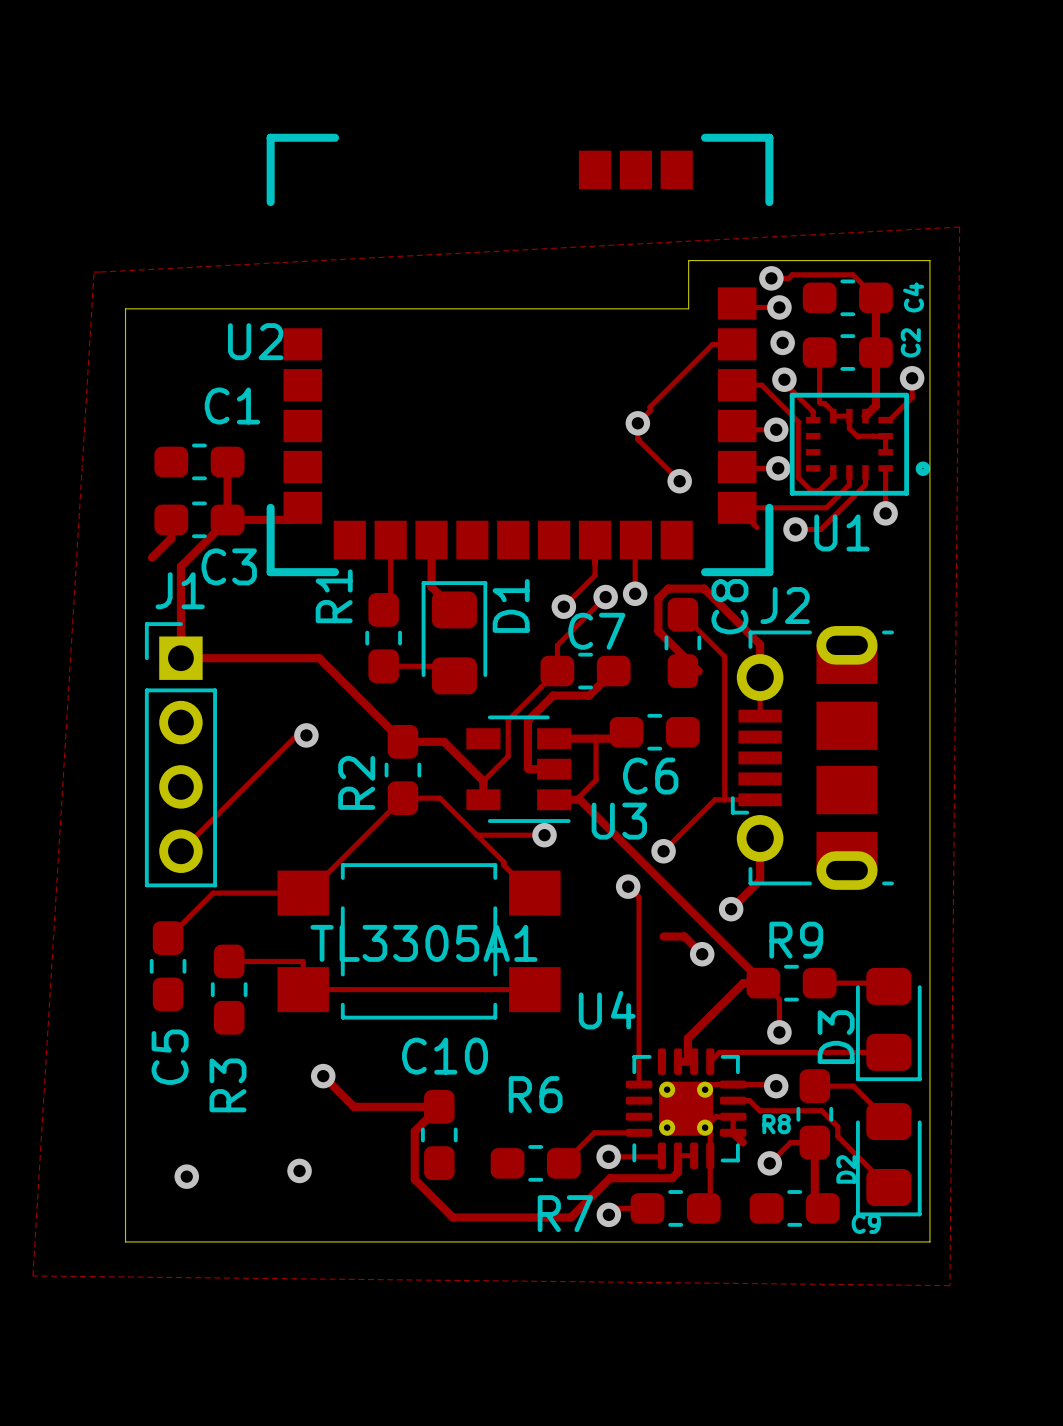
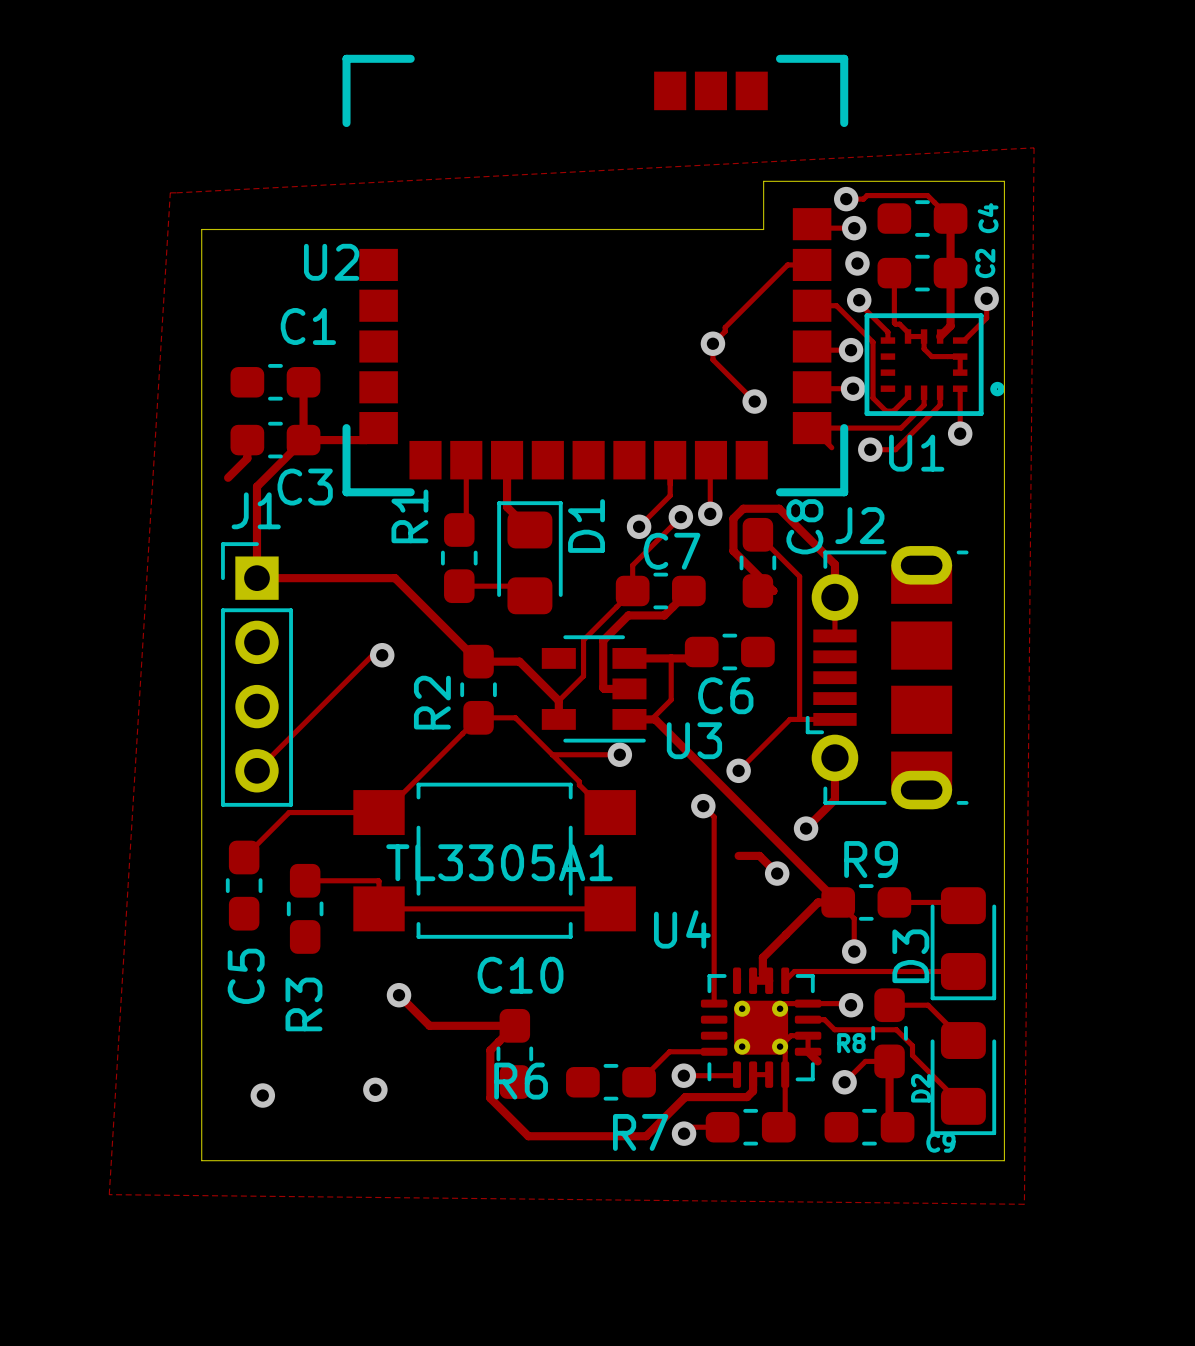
R6 name position: R6 (535, 1094) -> R6 (521, 1081)

